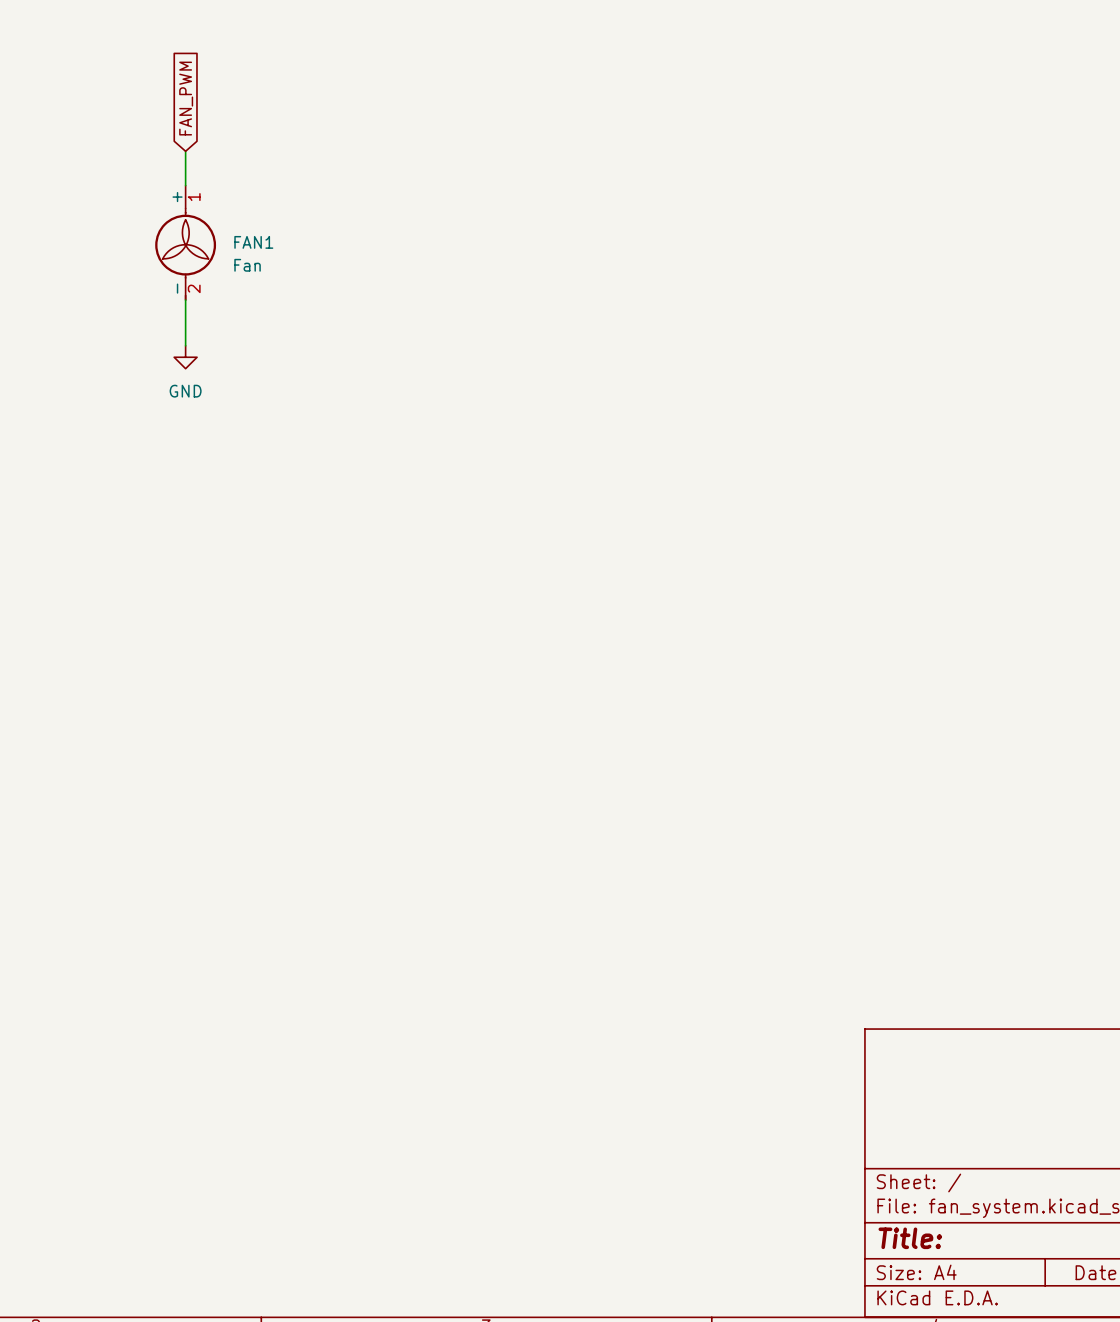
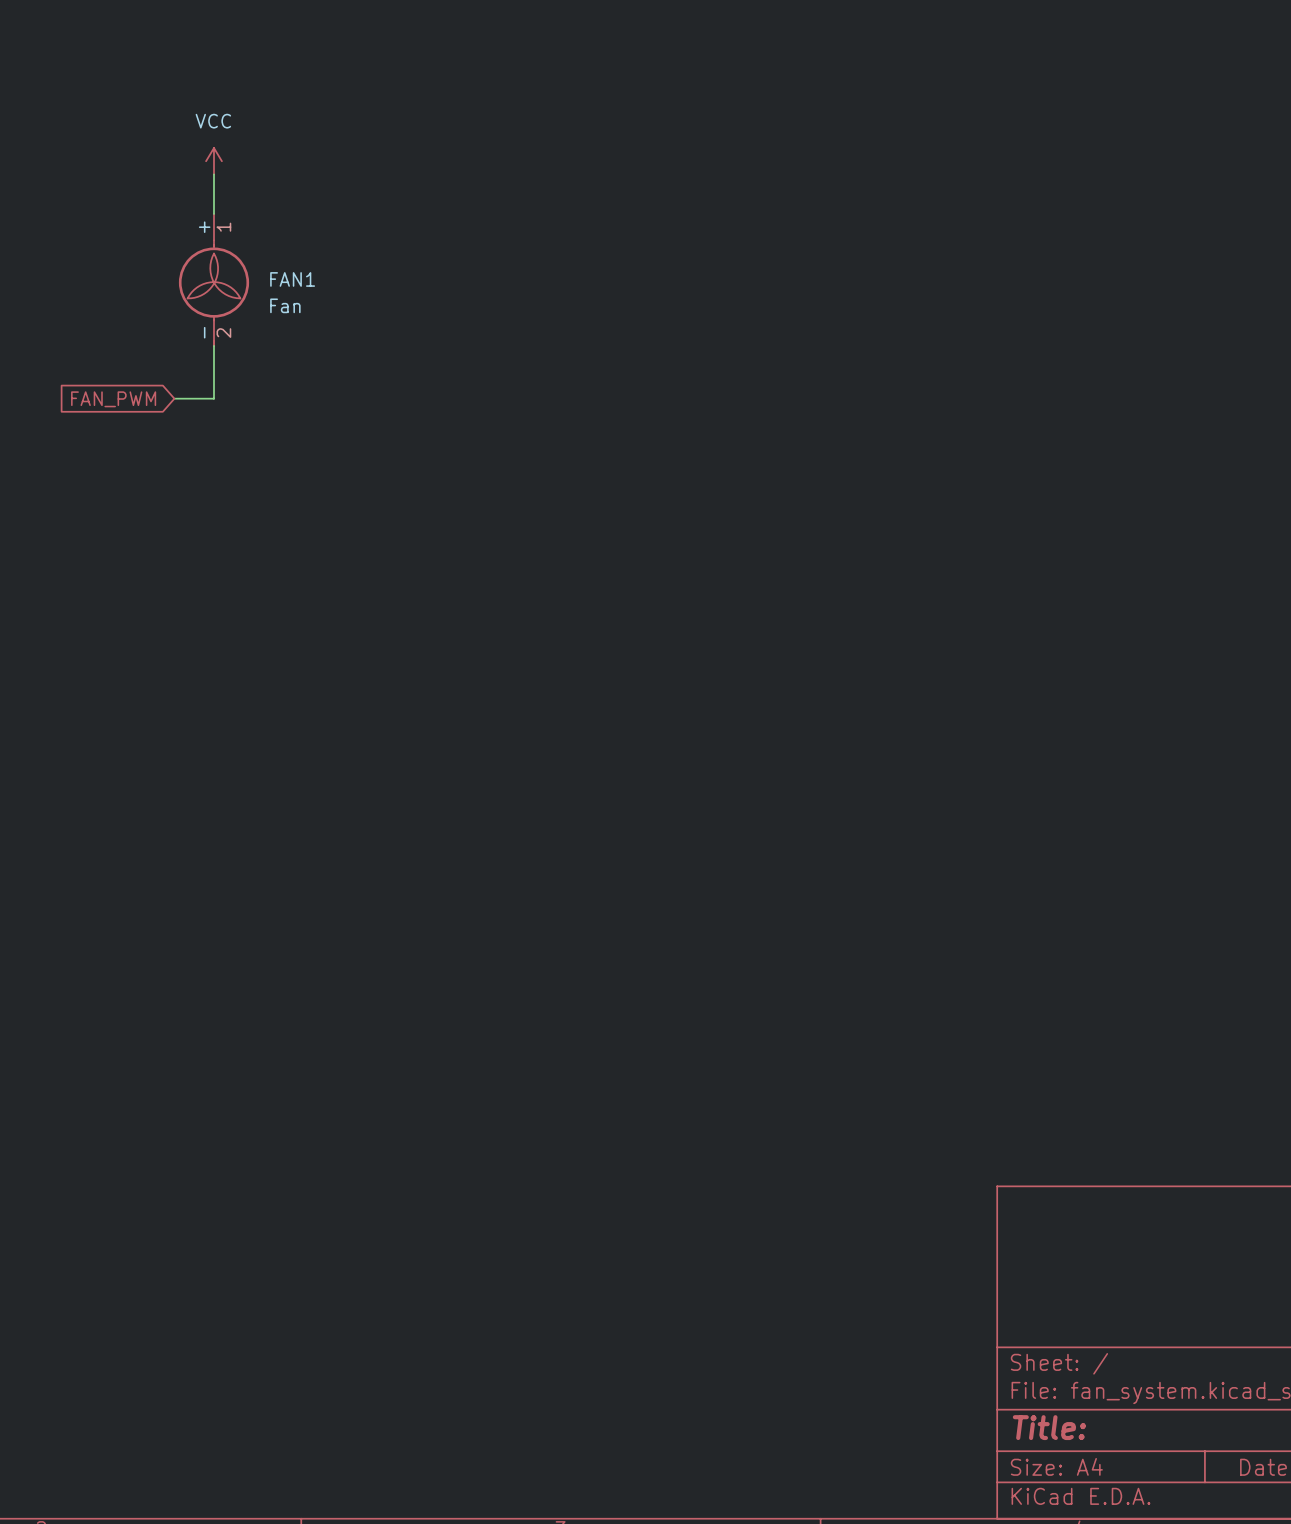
global label rotation: 0° (186, 98) -> 90° counterclockwise (113, 399)
global label position: FAN_PWM (186, 98) -> FAN_PWM (113, 399)
power symbol: none -> VCC (213, 161)
wire: none -> (174, 398) (213, 398)
power symbol: GND (185, 357) -> none

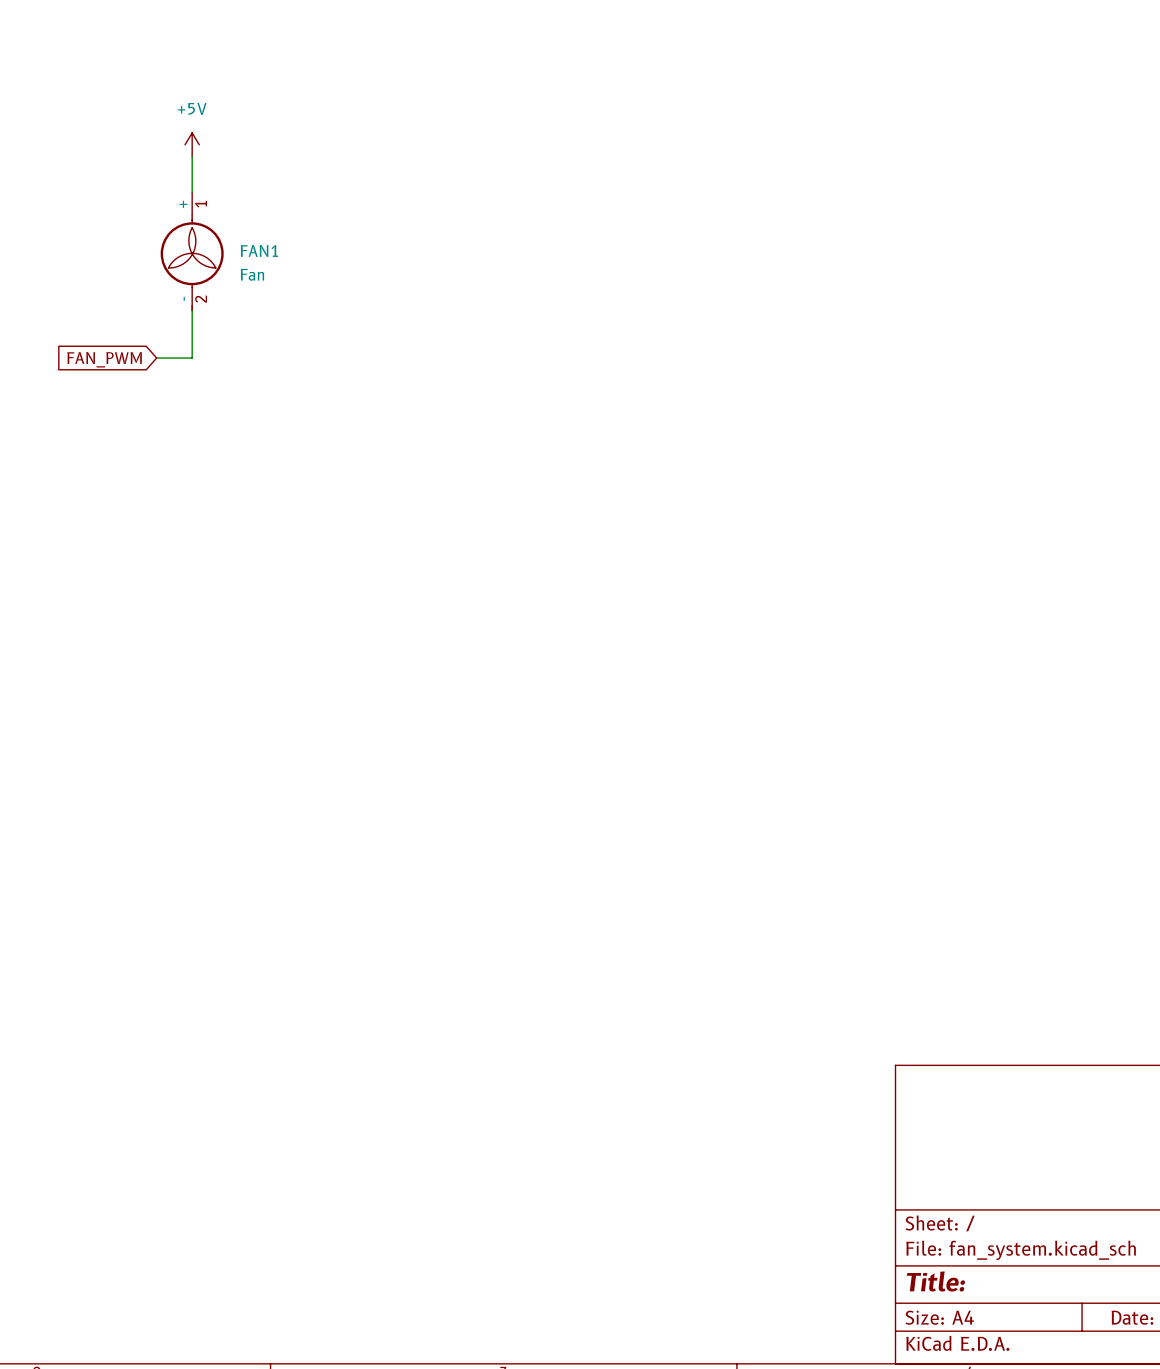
power symbol: VCC (213, 161) -> +5V (192, 144)

